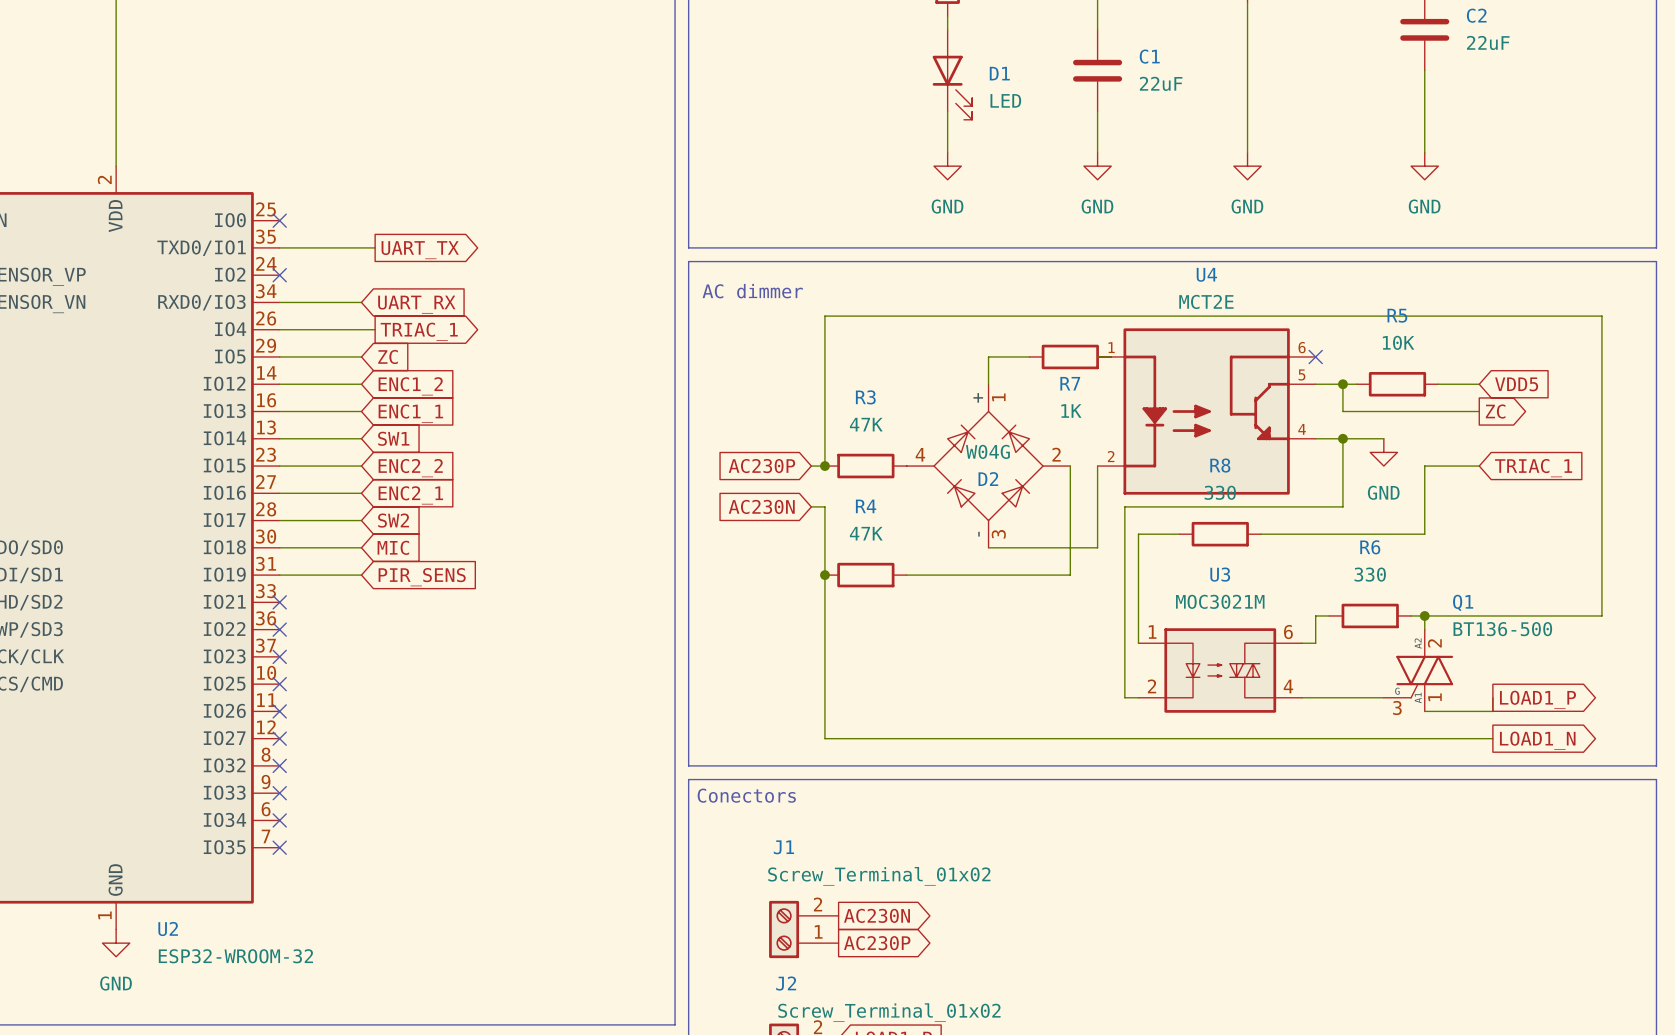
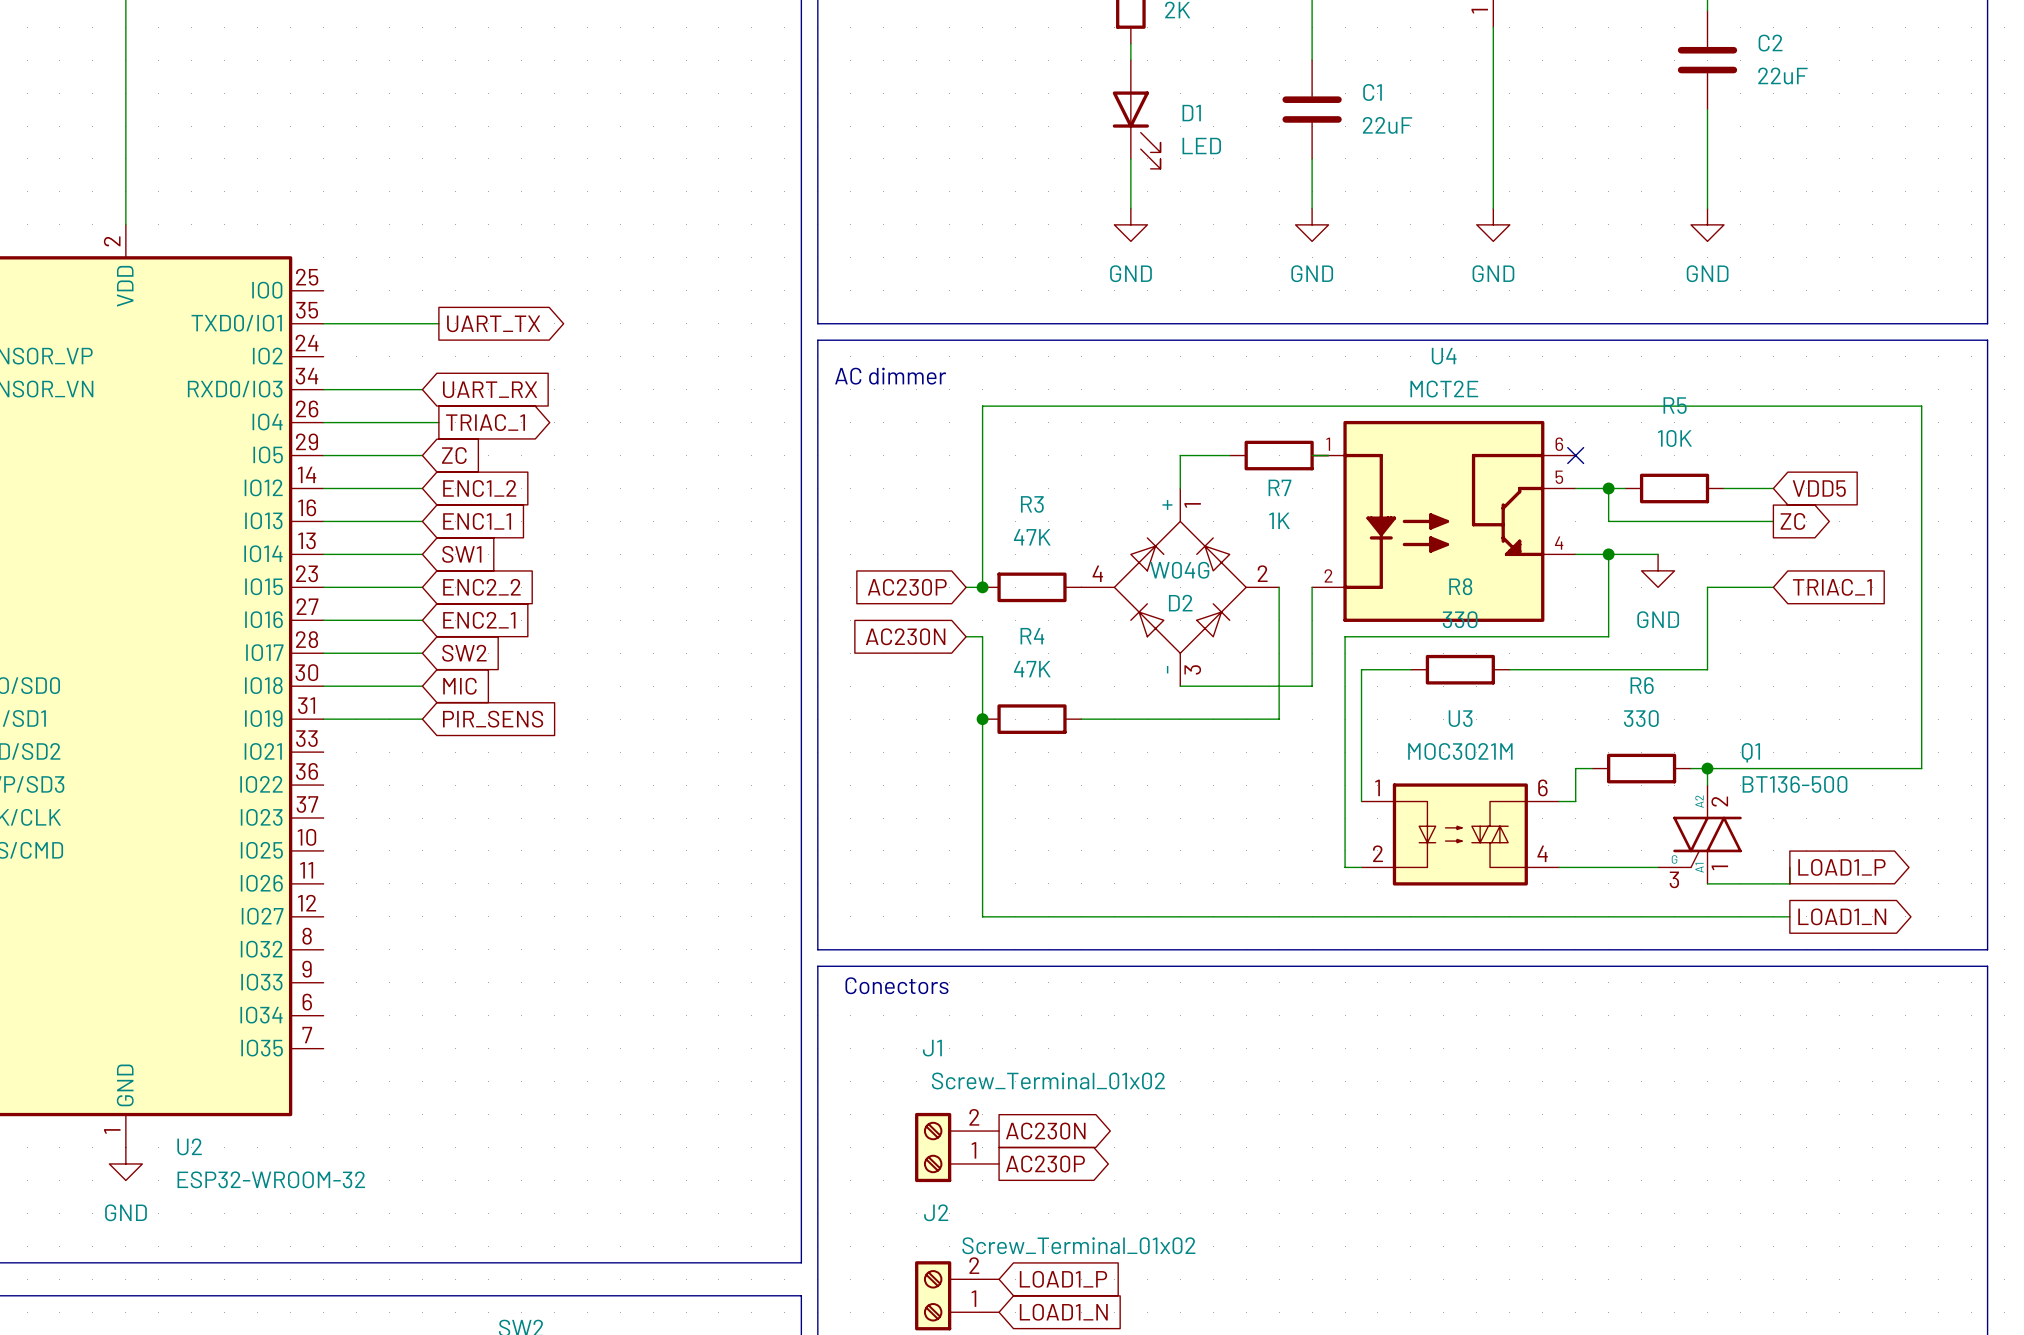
no-connect mark: (279, 220) -> none
no-connect mark: (279, 275) -> none
no-connect mark: (279, 602) -> none
no-connect mark: (279, 629) -> none
no-connect mark: (279, 656) -> none
no-connect mark: (279, 684) -> none
no-connect mark: (279, 711) -> none
no-connect mark: (279, 738) -> none
no-connect mark: (279, 765) -> none
no-connect mark: (279, 793) -> none
no-connect mark: (279, 820) -> none
no-connect mark: (279, 847) -> none

